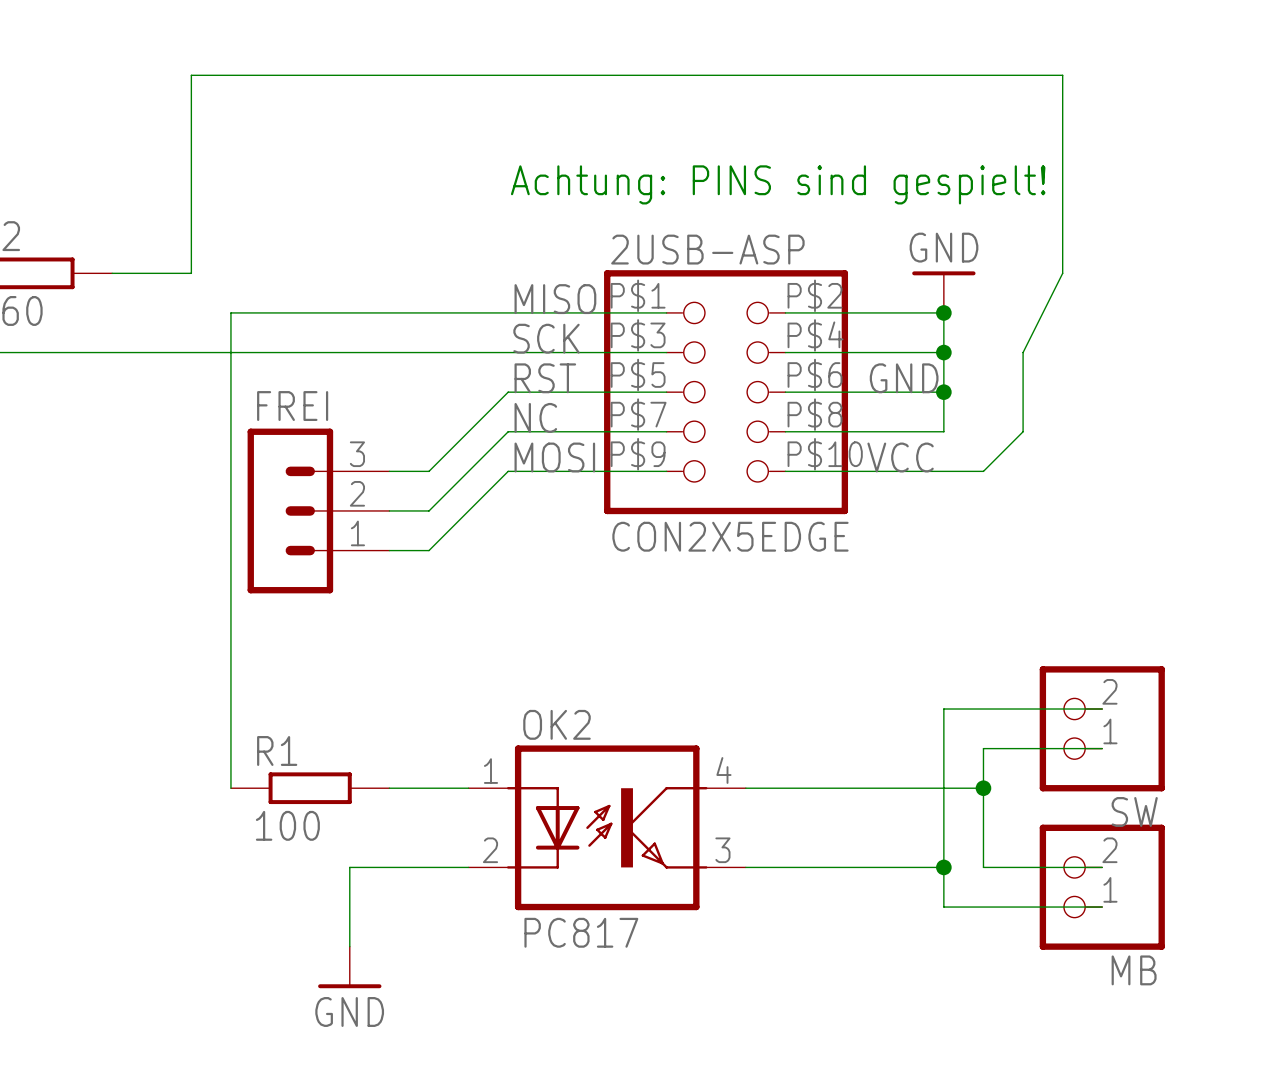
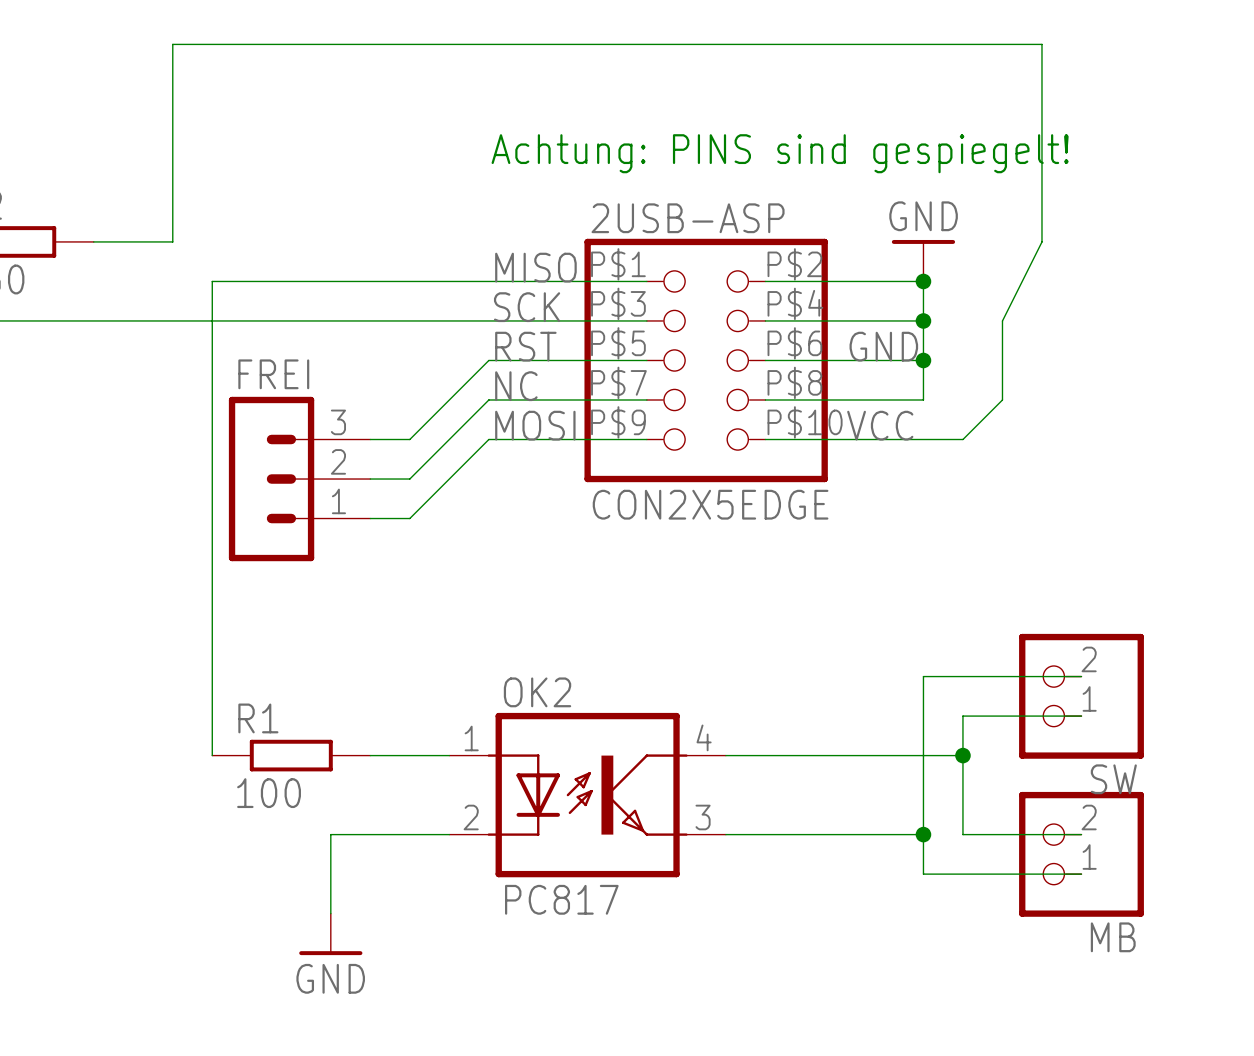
text: Achtung: PINS sind gespielt! (778, 184) -> Achtung: PINS sind gespiegelt! (780, 153)

